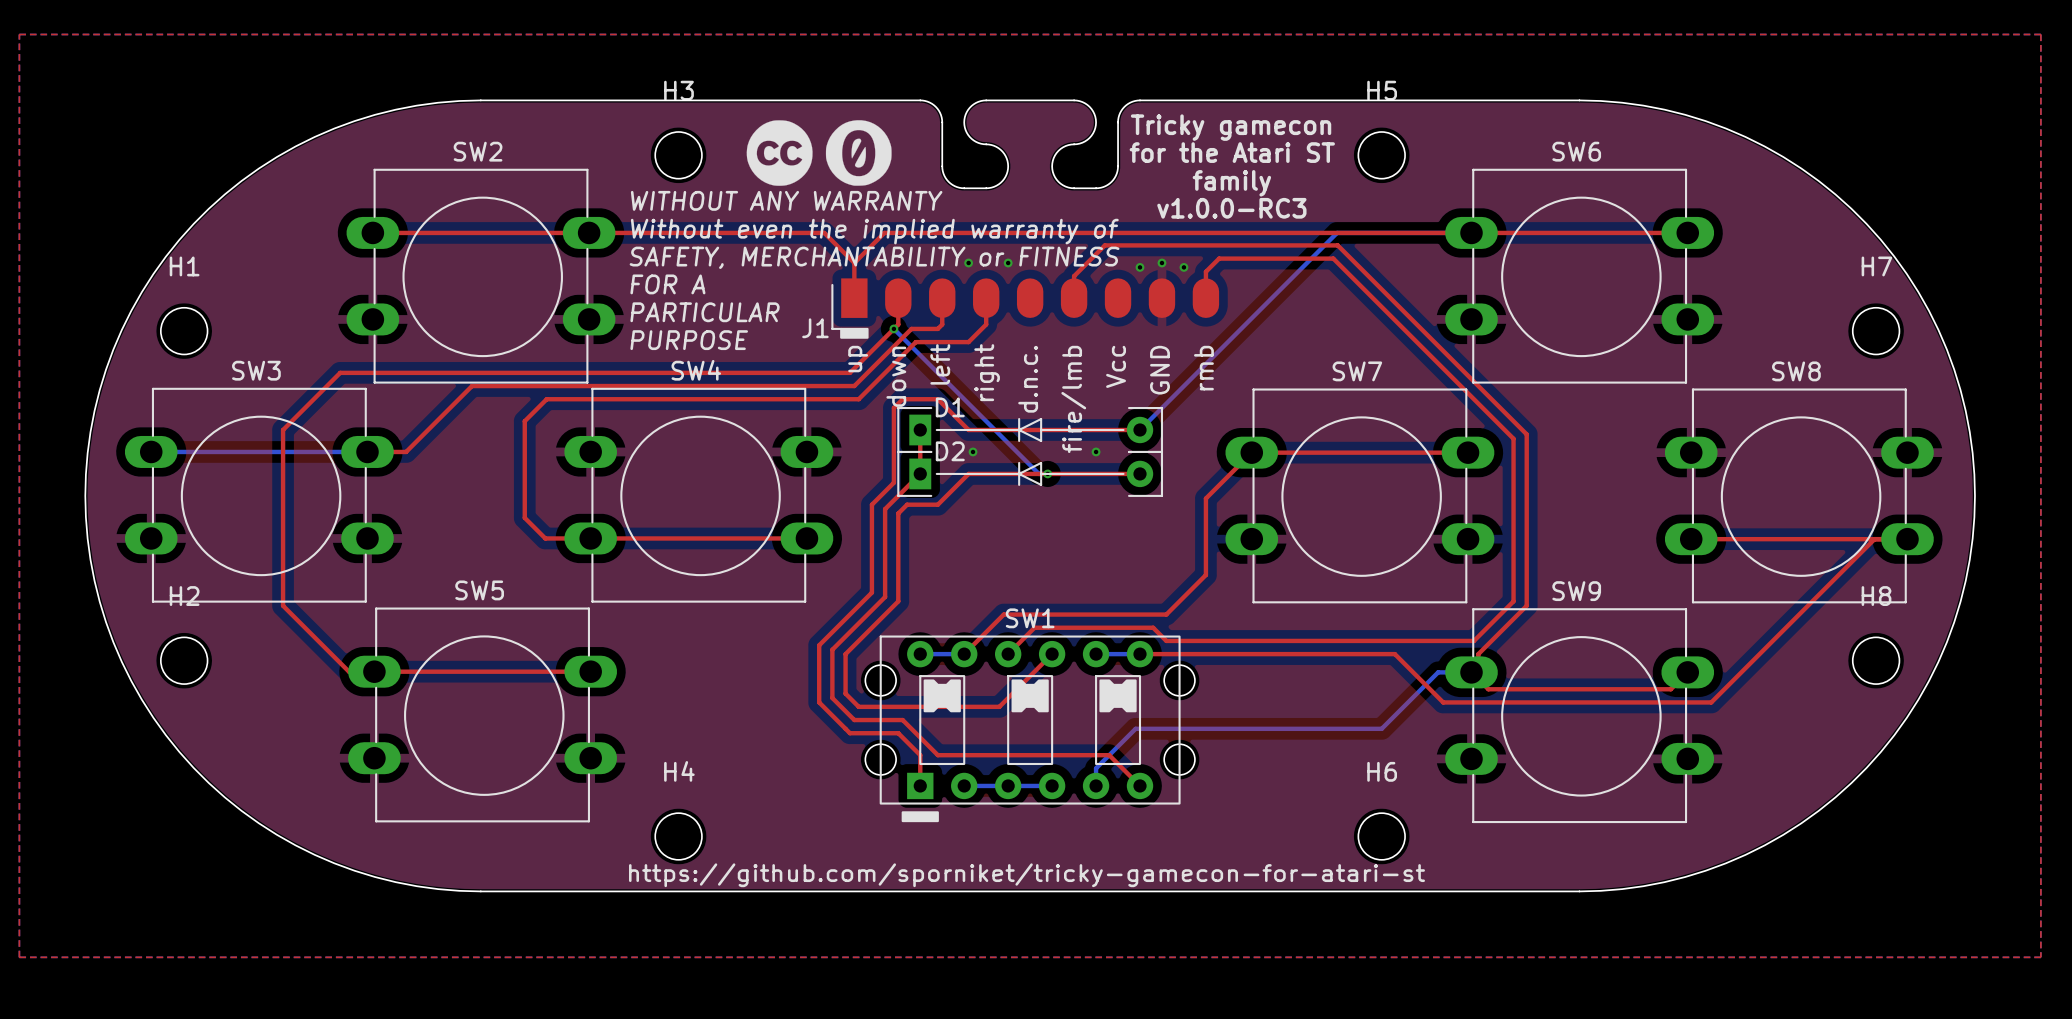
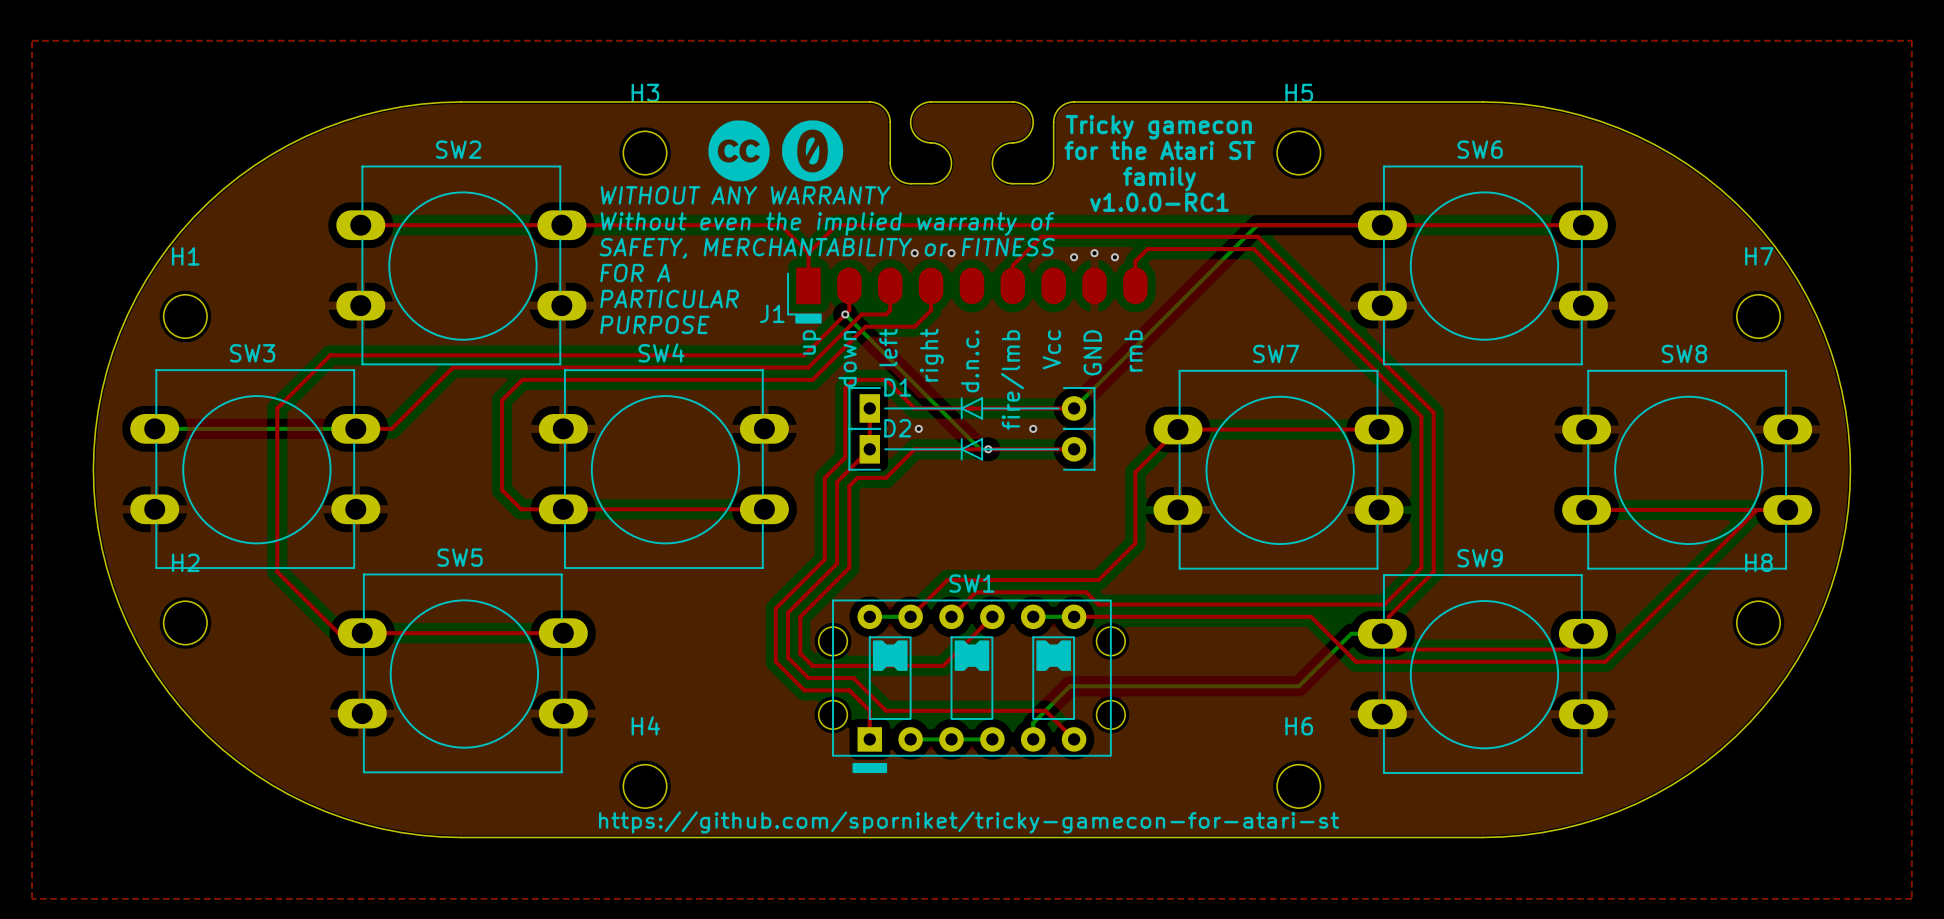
text: v1.0.0-RC3 (1231, 208) -> v1.0.0-RC1 (1159, 202)

